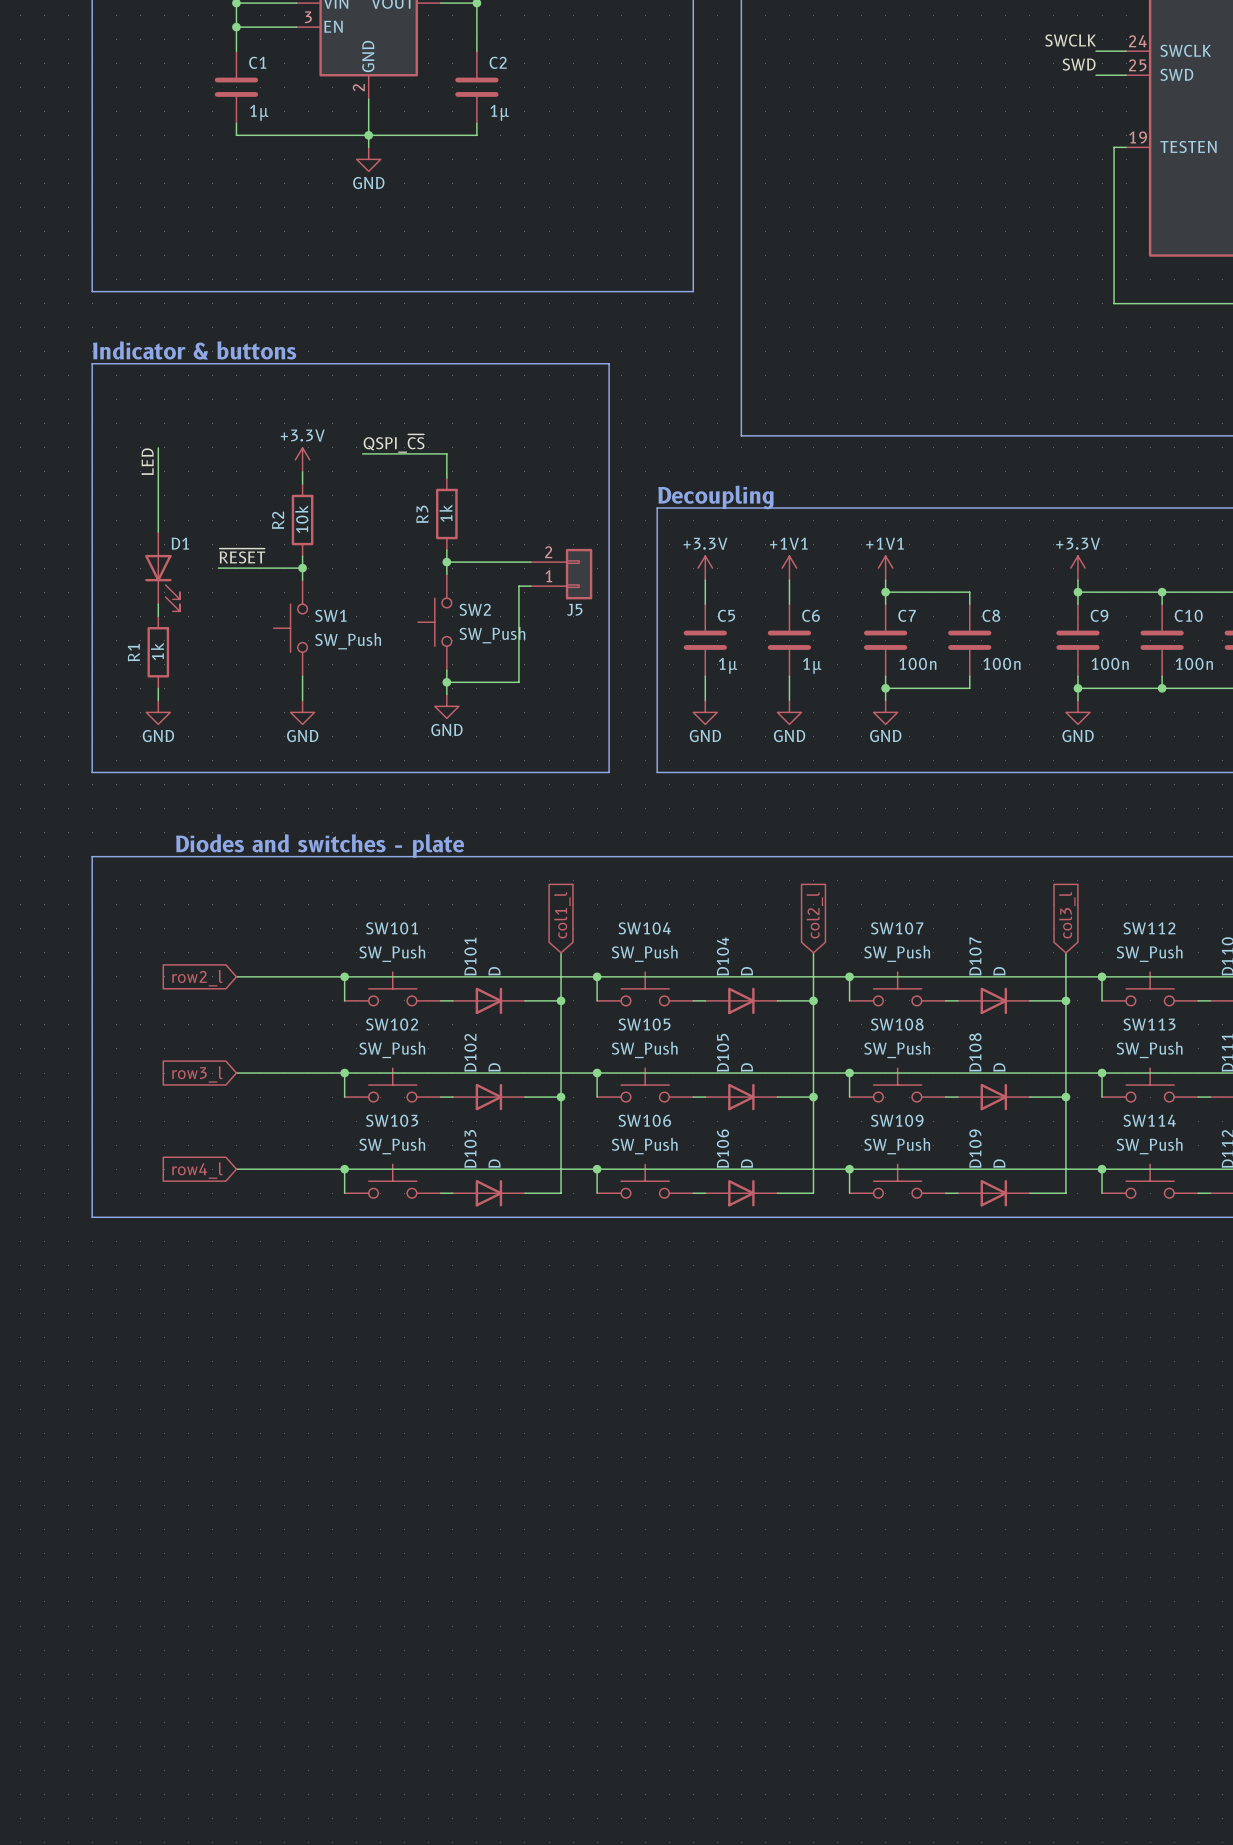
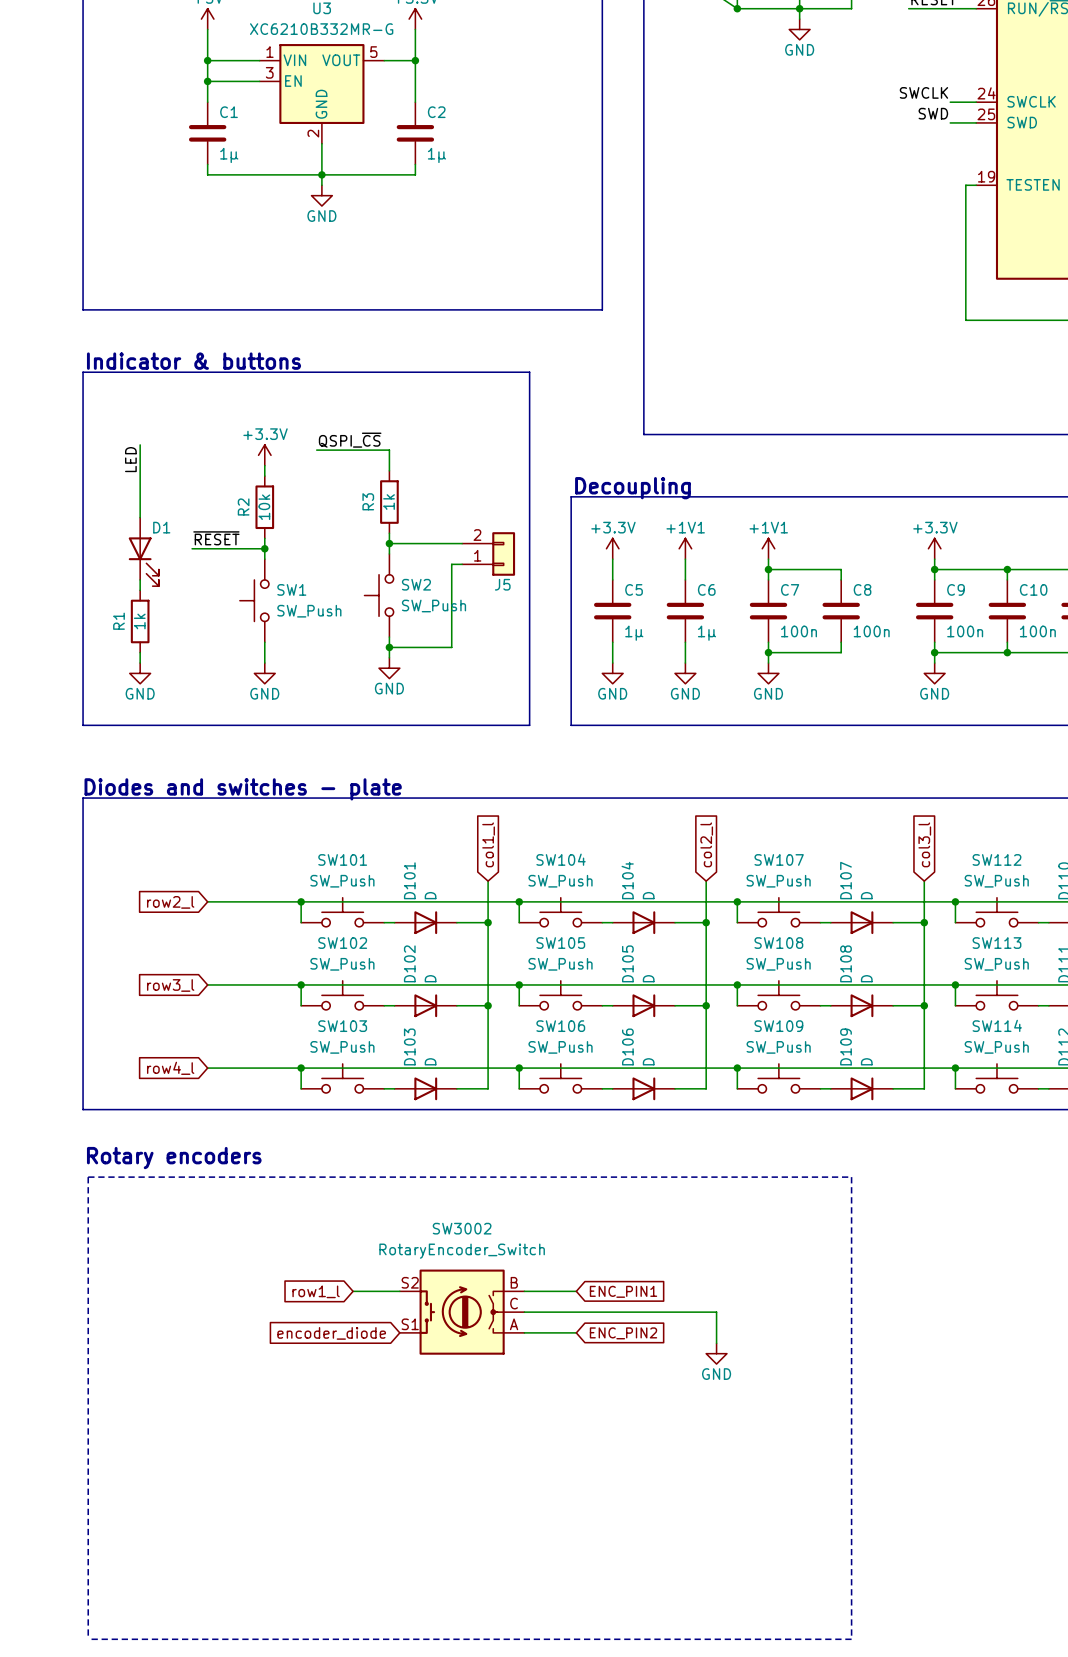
text: none -> Rotary encoders (174, 1158)
line: none -> (88, 1177) (851, 1177) (851, 1639) (88, 1639) (88, 1177)
wire: none -> (353, 1291) (399, 1291)
wire: none -> (524, 1291) (576, 1291)
global label: none -> row1_l (316, 1291)
global label: none -> ENC_PIN1 (623, 1291)
SW3002: none -> RotaryEncoder_Switch (462, 1312)
wire: none -> (524, 1312) (716, 1312) (716, 1343)
wire: none -> (524, 1332) (576, 1332)
global label: none -> encoder_diode (331, 1333)
global label: none -> ENC_PIN2 (623, 1333)
power symbol: none -> GND (716, 1353)

